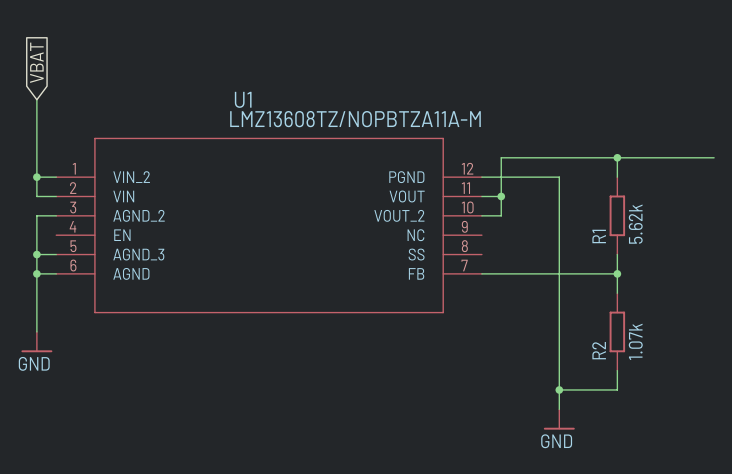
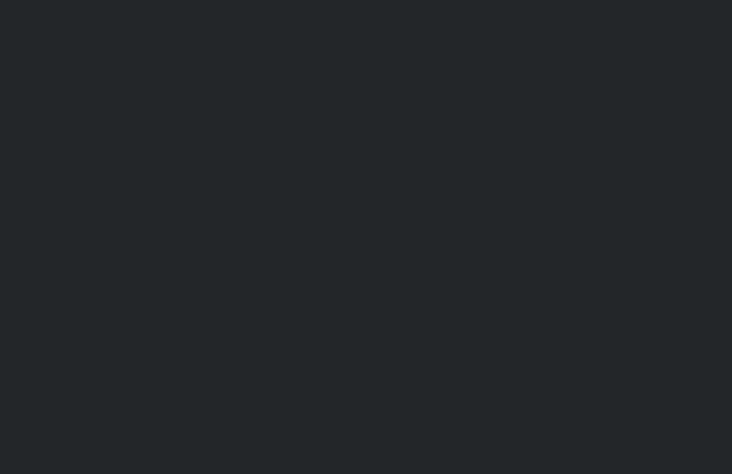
global label: VBAT (36, 62) -> none
wire: (36, 99) (36, 196) (56, 196) -> none
wire: (617, 157) (617, 177) -> none
junction: (617, 157) -> none
wire: (714, 157) (501, 157) (501, 215) (481, 215) -> none
wire: (36, 177) (56, 177) -> none
junction: (36, 177) -> none
wire: (481, 177) (559, 177) (559, 409) -> none
wire: (481, 196) (501, 196) -> none
junction: (501, 196) -> none
wire: (56, 215) (36, 215) (36, 331) -> none
R1: 5.62k (617, 215) -> none
U1: LMZ13608TZ/NOPBTZA11A-M (269, 225) -> none
wire: (36, 254) (56, 254) -> none
junction: (36, 254) -> none
wire: (617, 254) (617, 293) -> none
wire: (36, 273) (56, 273) -> none
junction: (36, 273) -> none
wire: (481, 273) (617, 273) -> none
junction: (617, 273) -> none
R2: 1.07k (617, 331) -> none
power symbol: GND (36, 342) -> none
wire: (617, 370) (617, 389) (559, 389) -> none
junction: (559, 389) -> none
power symbol: GND (559, 419) -> none

